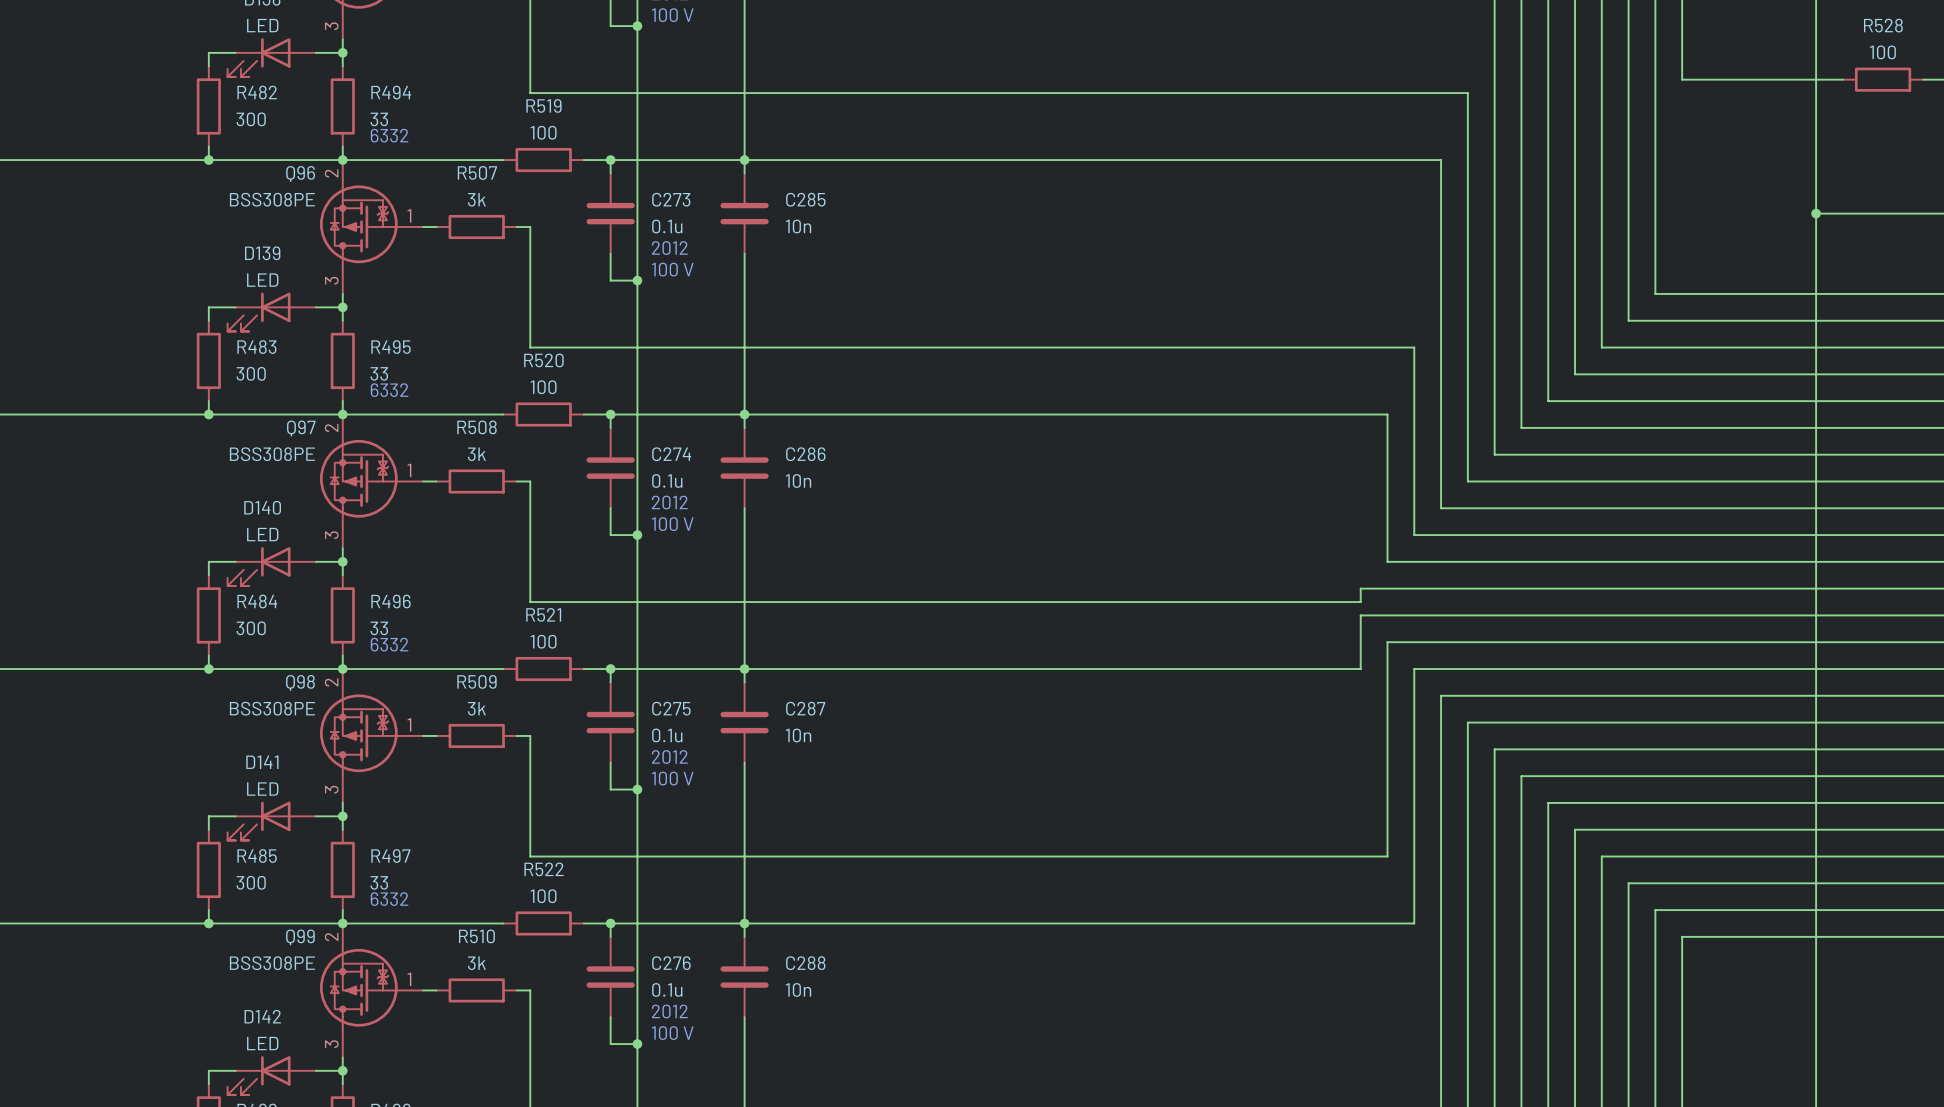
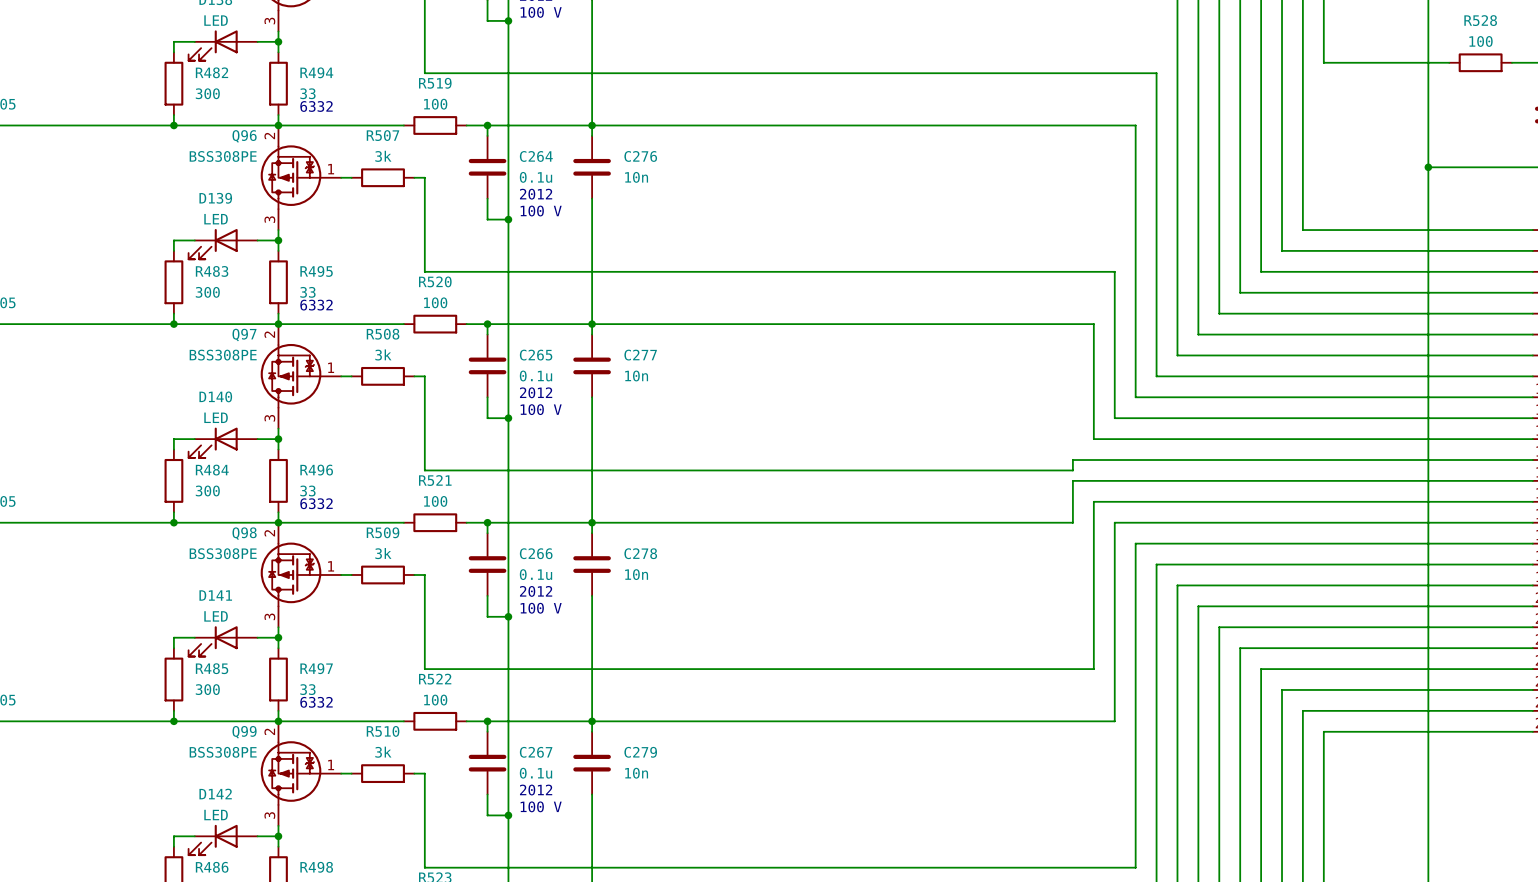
C273 name: C273 (671, 199) -> C264 (536, 156)
C285 name: C285 (805, 199) -> C276 (640, 156)
C274 name: C274 (671, 454) -> C265 (536, 355)
C286 name: C286 (805, 454) -> C277 (640, 355)
C275 name: C275 (671, 708) -> C266 (536, 553)
C287 name: C287 (805, 708) -> C278 (640, 553)
C276 name: C276 (671, 963) -> C267 (536, 752)
C288 name: C288 (805, 963) -> C279 (640, 752)

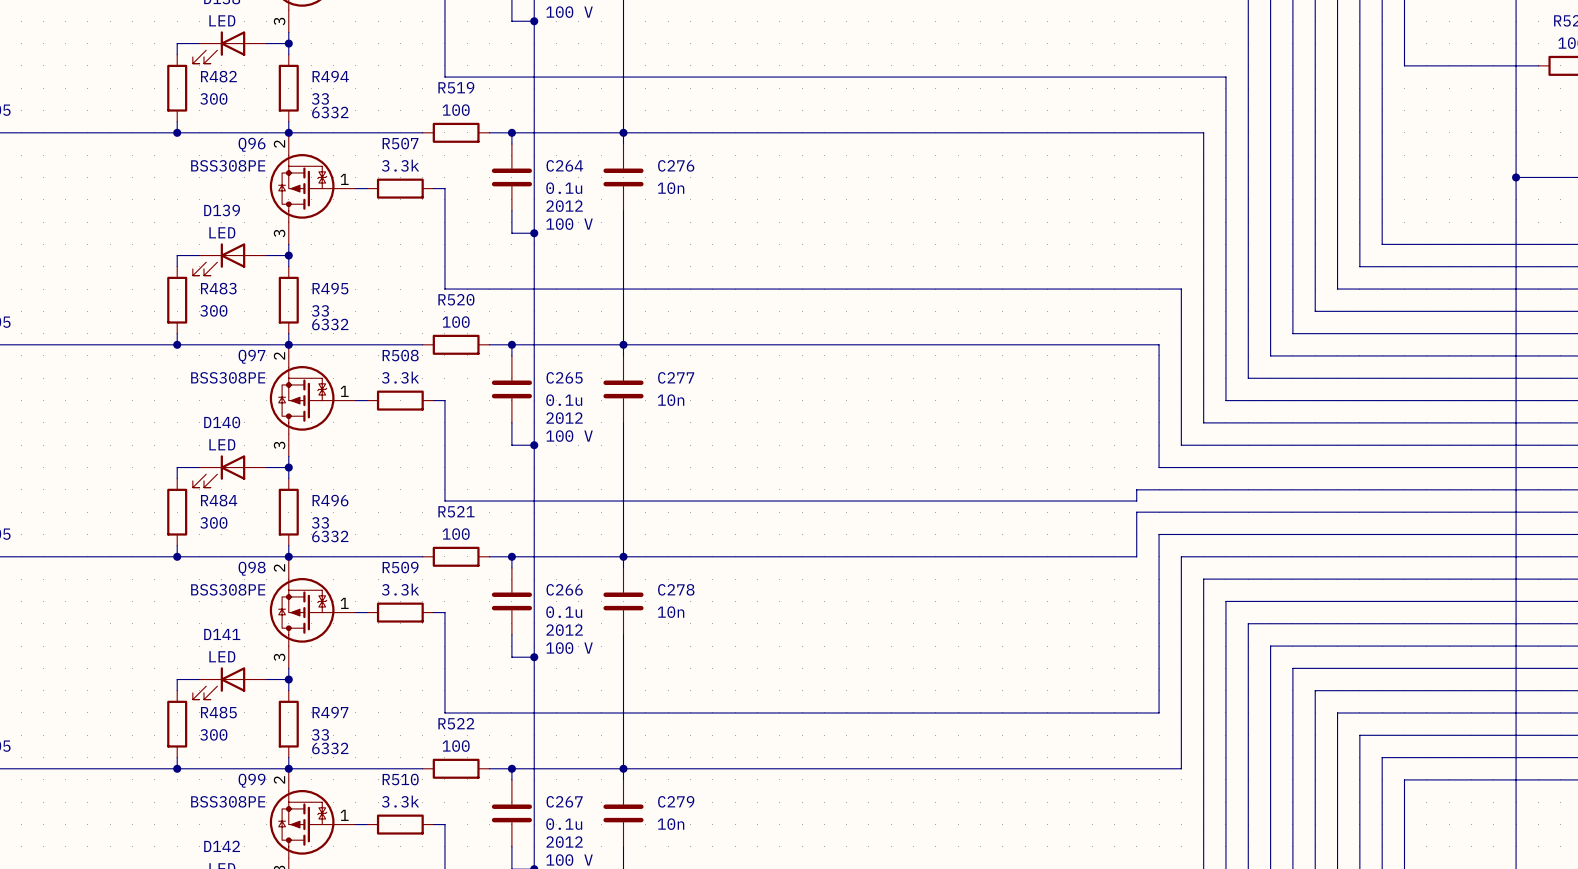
R507 value: 3k (383, 156) -> 3.3k (400, 165)
R508 value: 3k (383, 354) -> 3.3k (400, 377)
R509 value: 3k (383, 553) -> 3.3k (400, 589)
R510 value: 3k (383, 752) -> 3.3k (400, 801)

